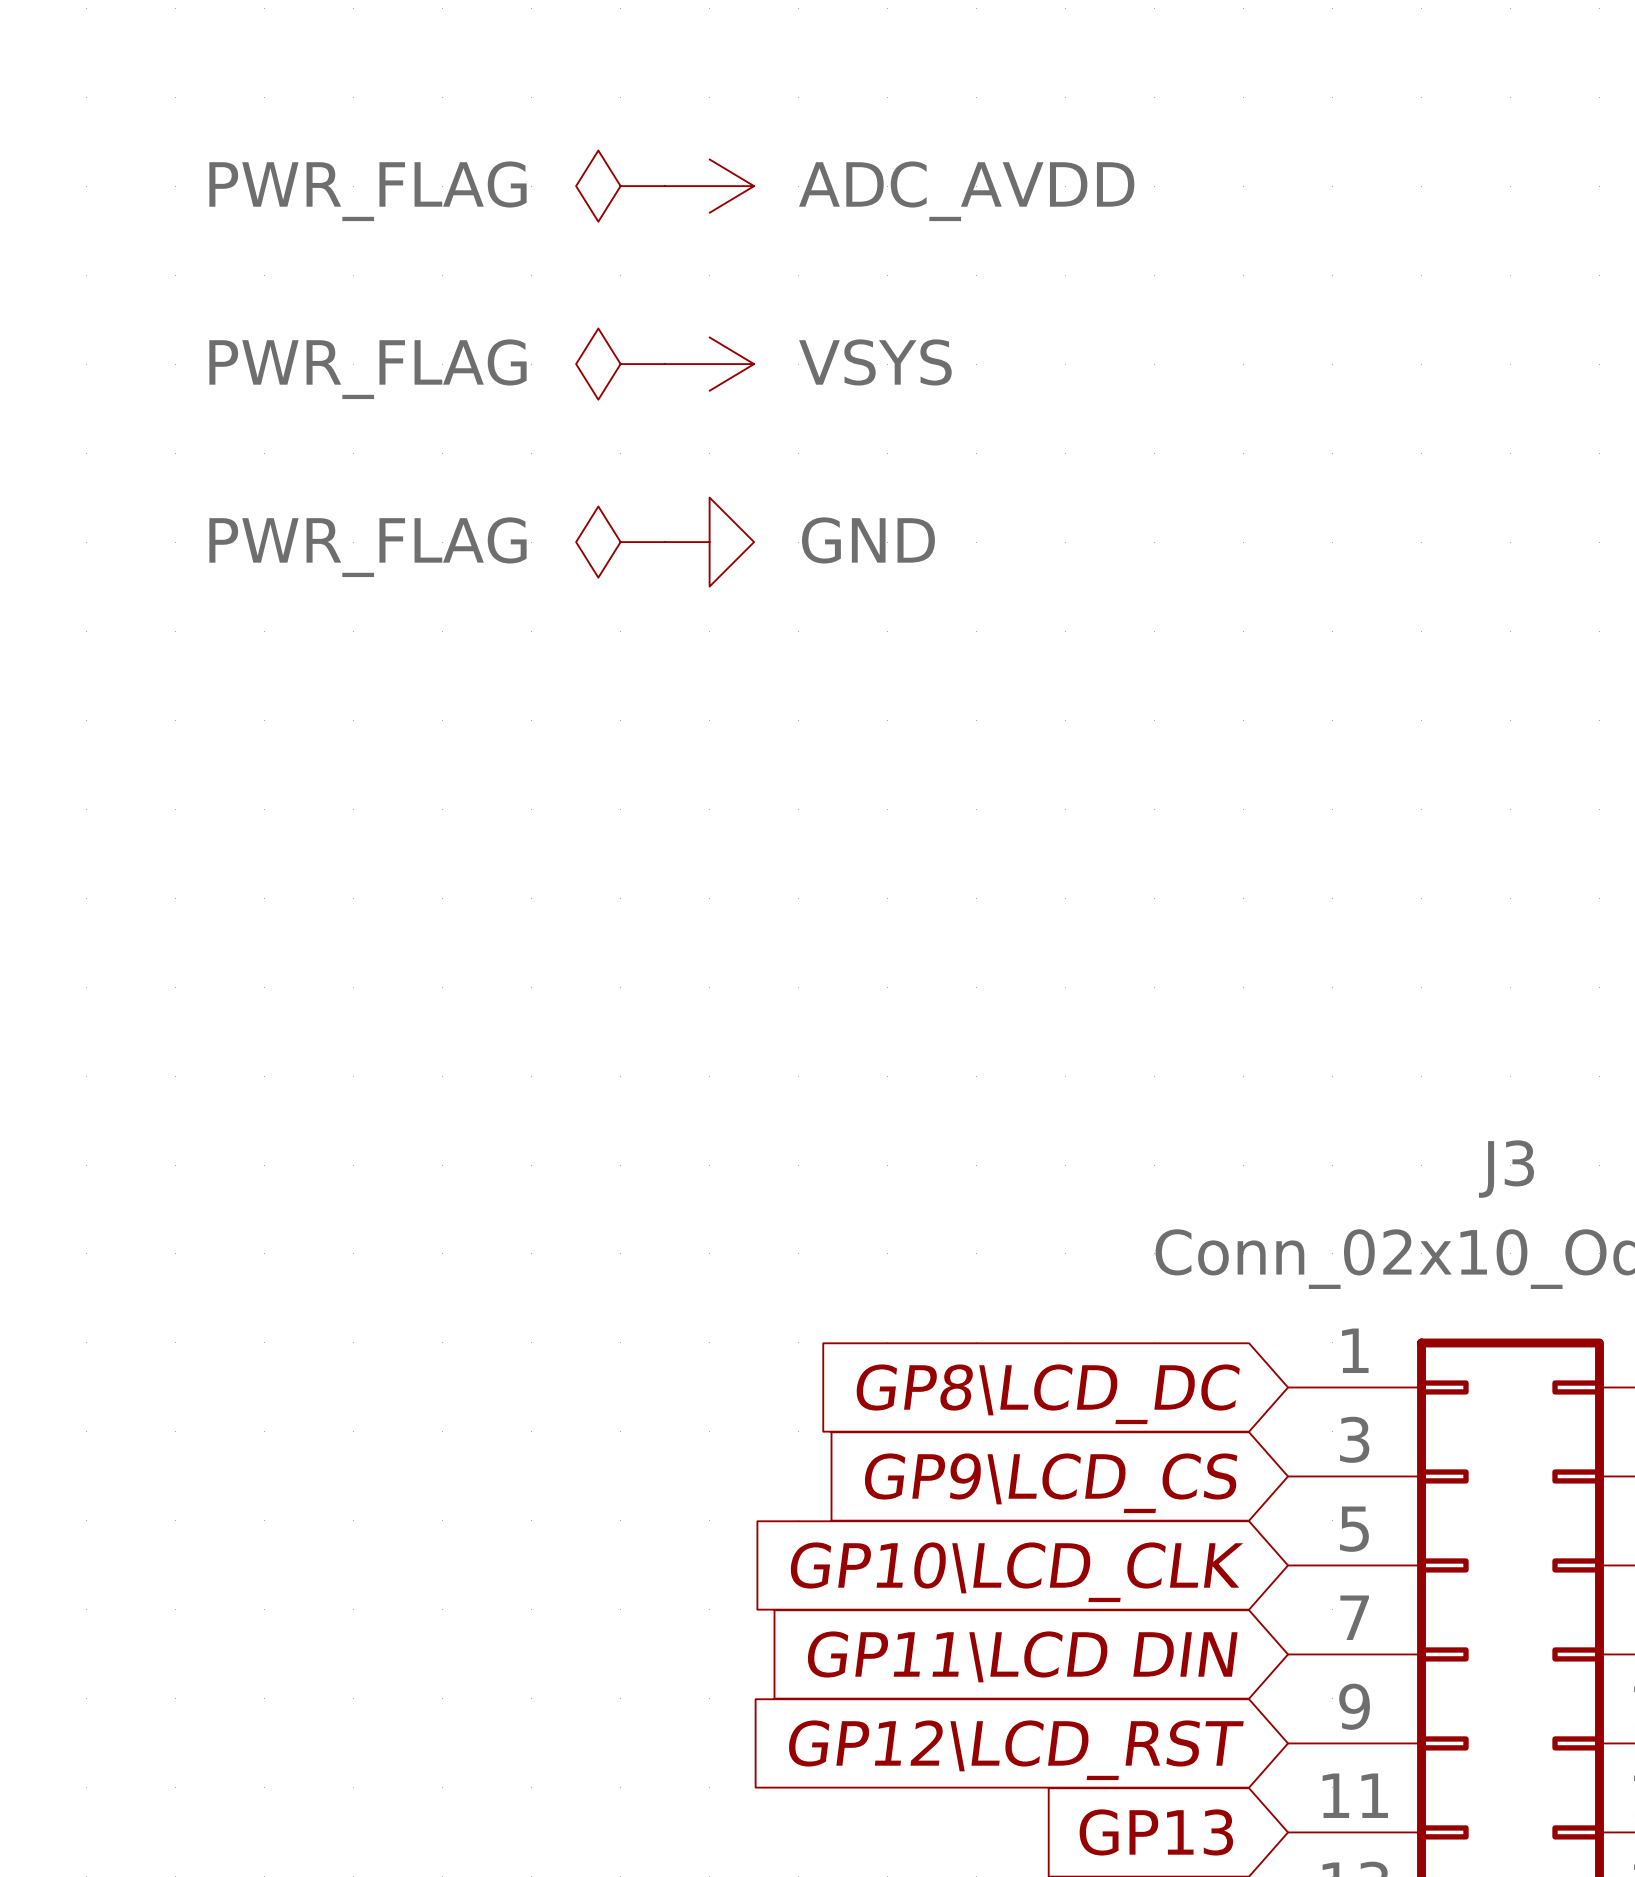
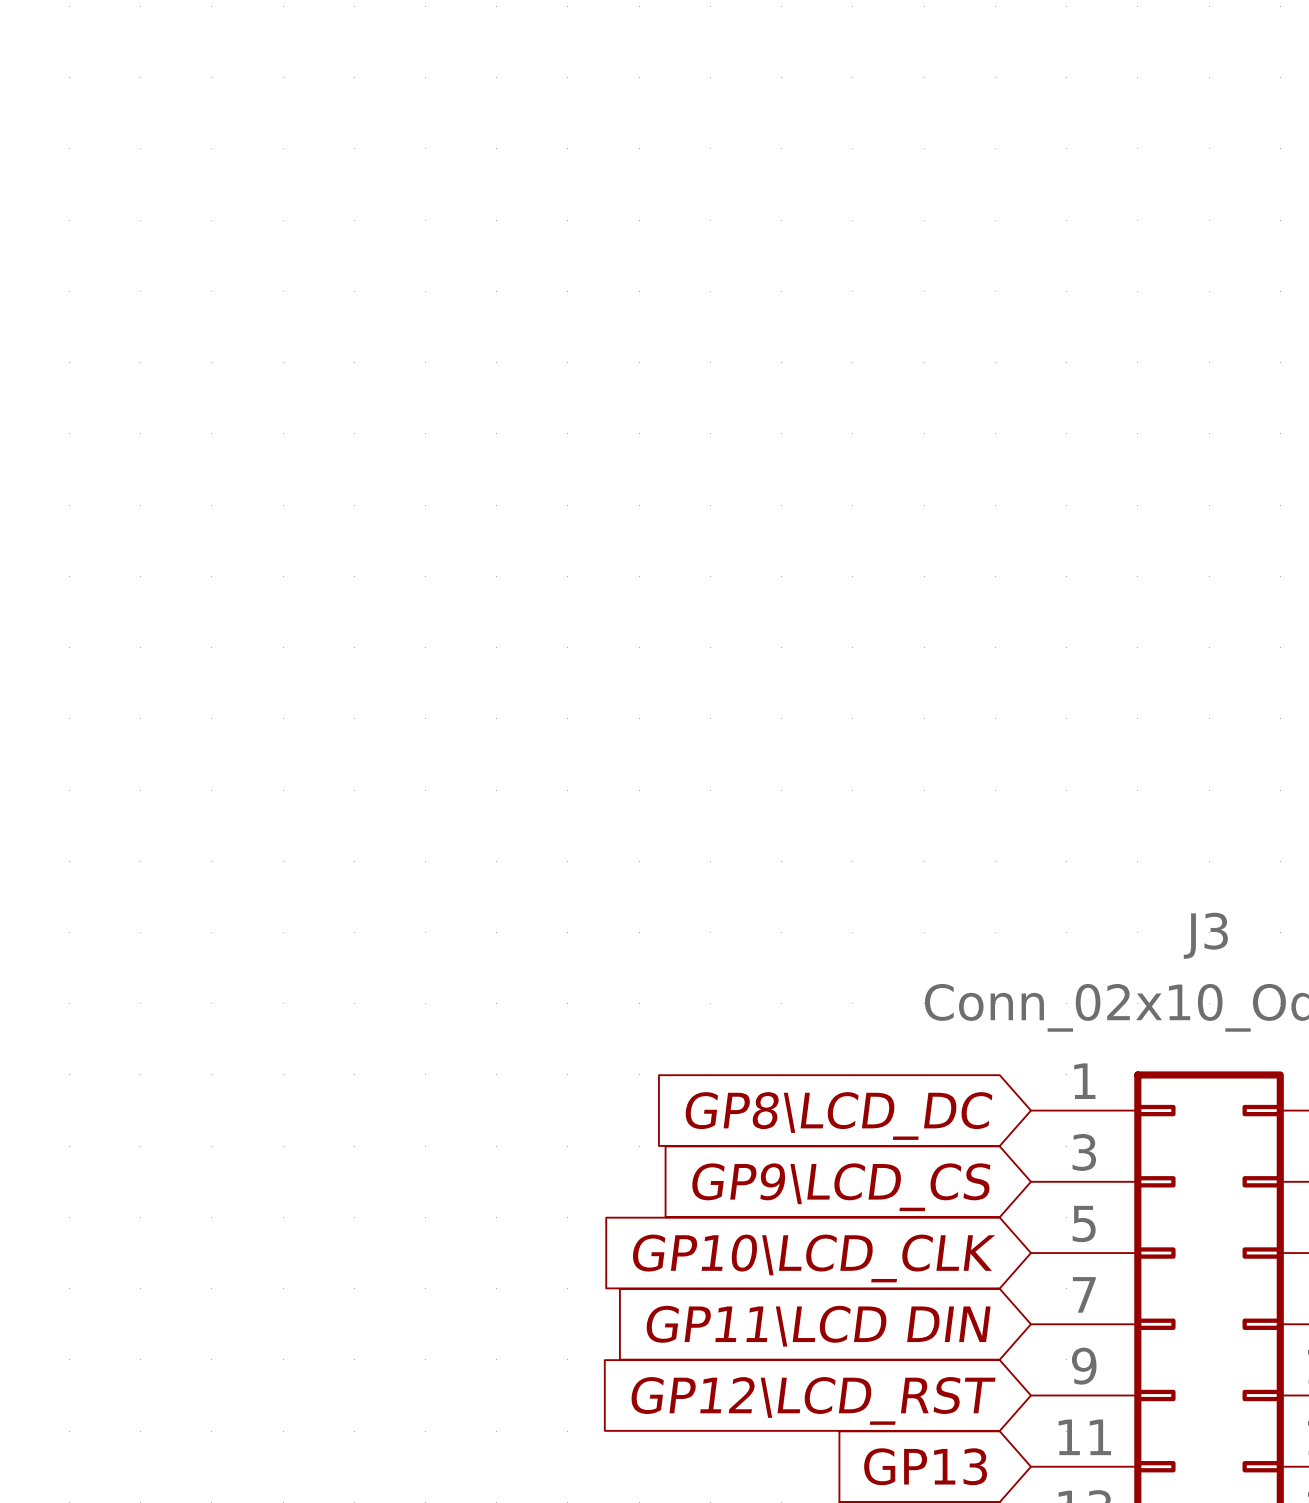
power symbol: PWR_FLAG (620, 186) -> none
power symbol: ADC_AVDD (709, 186) -> none
power symbol: PWR_FLAG (620, 364) -> none
power symbol: VSYS (709, 364) -> none
power symbol: PWR_FLAG (620, 542) -> none
power symbol: GND (709, 542) -> none

